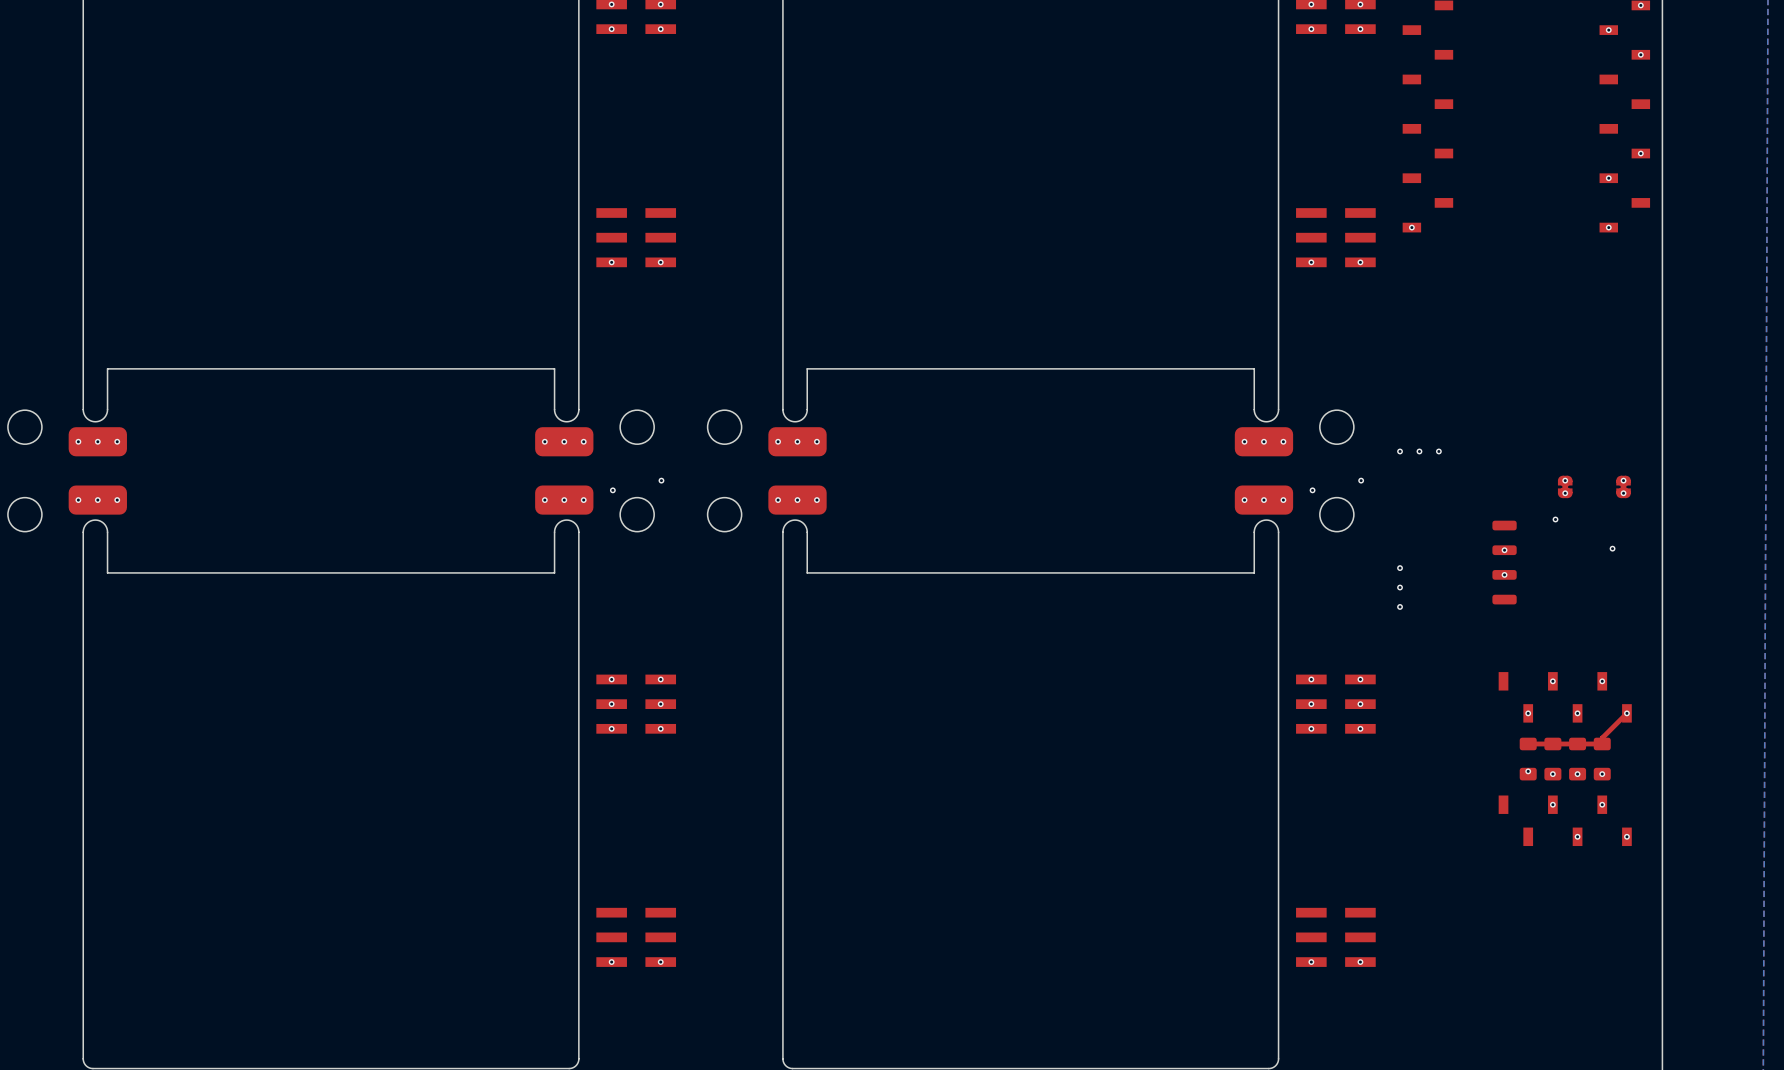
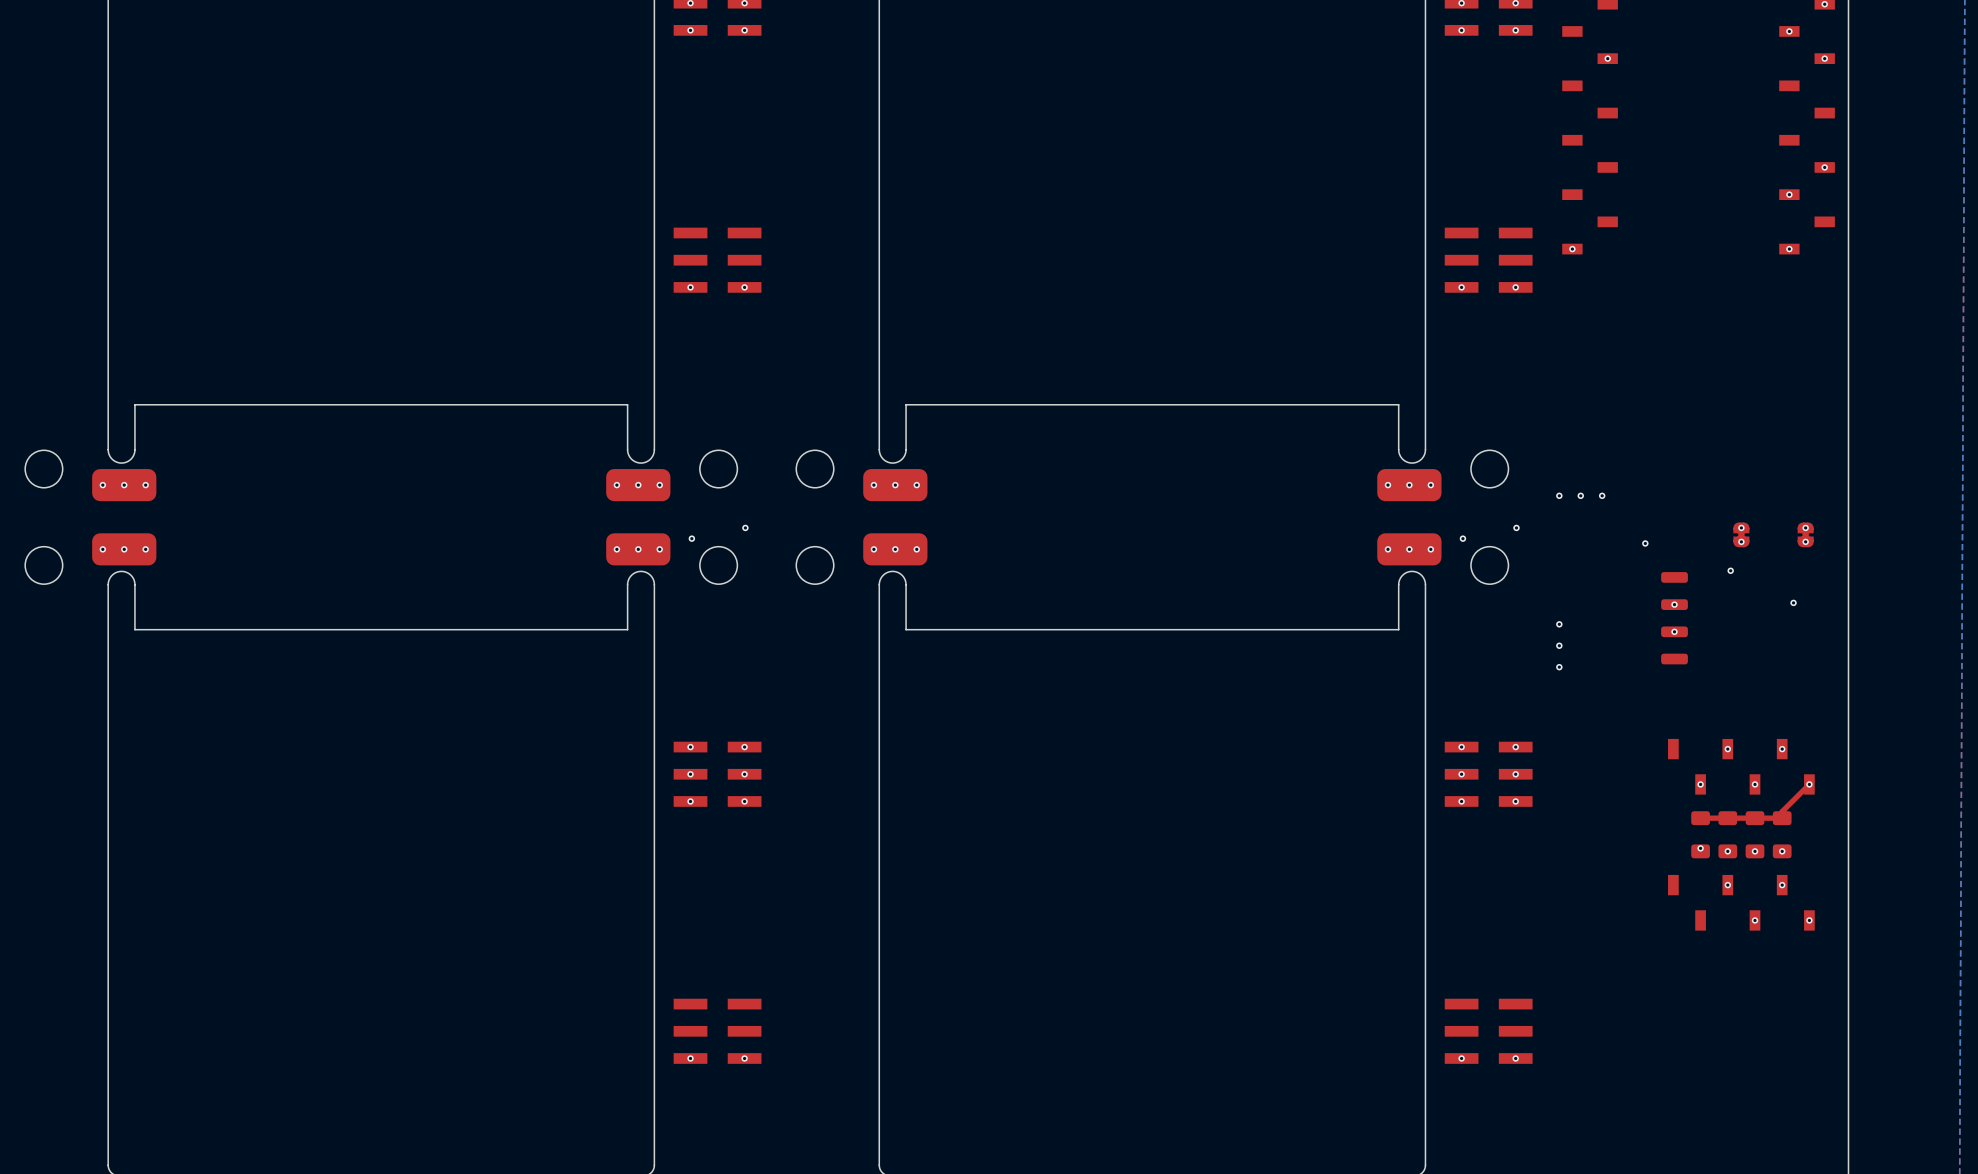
via: none -> (1607, 58)
via: none -> (1645, 543)

